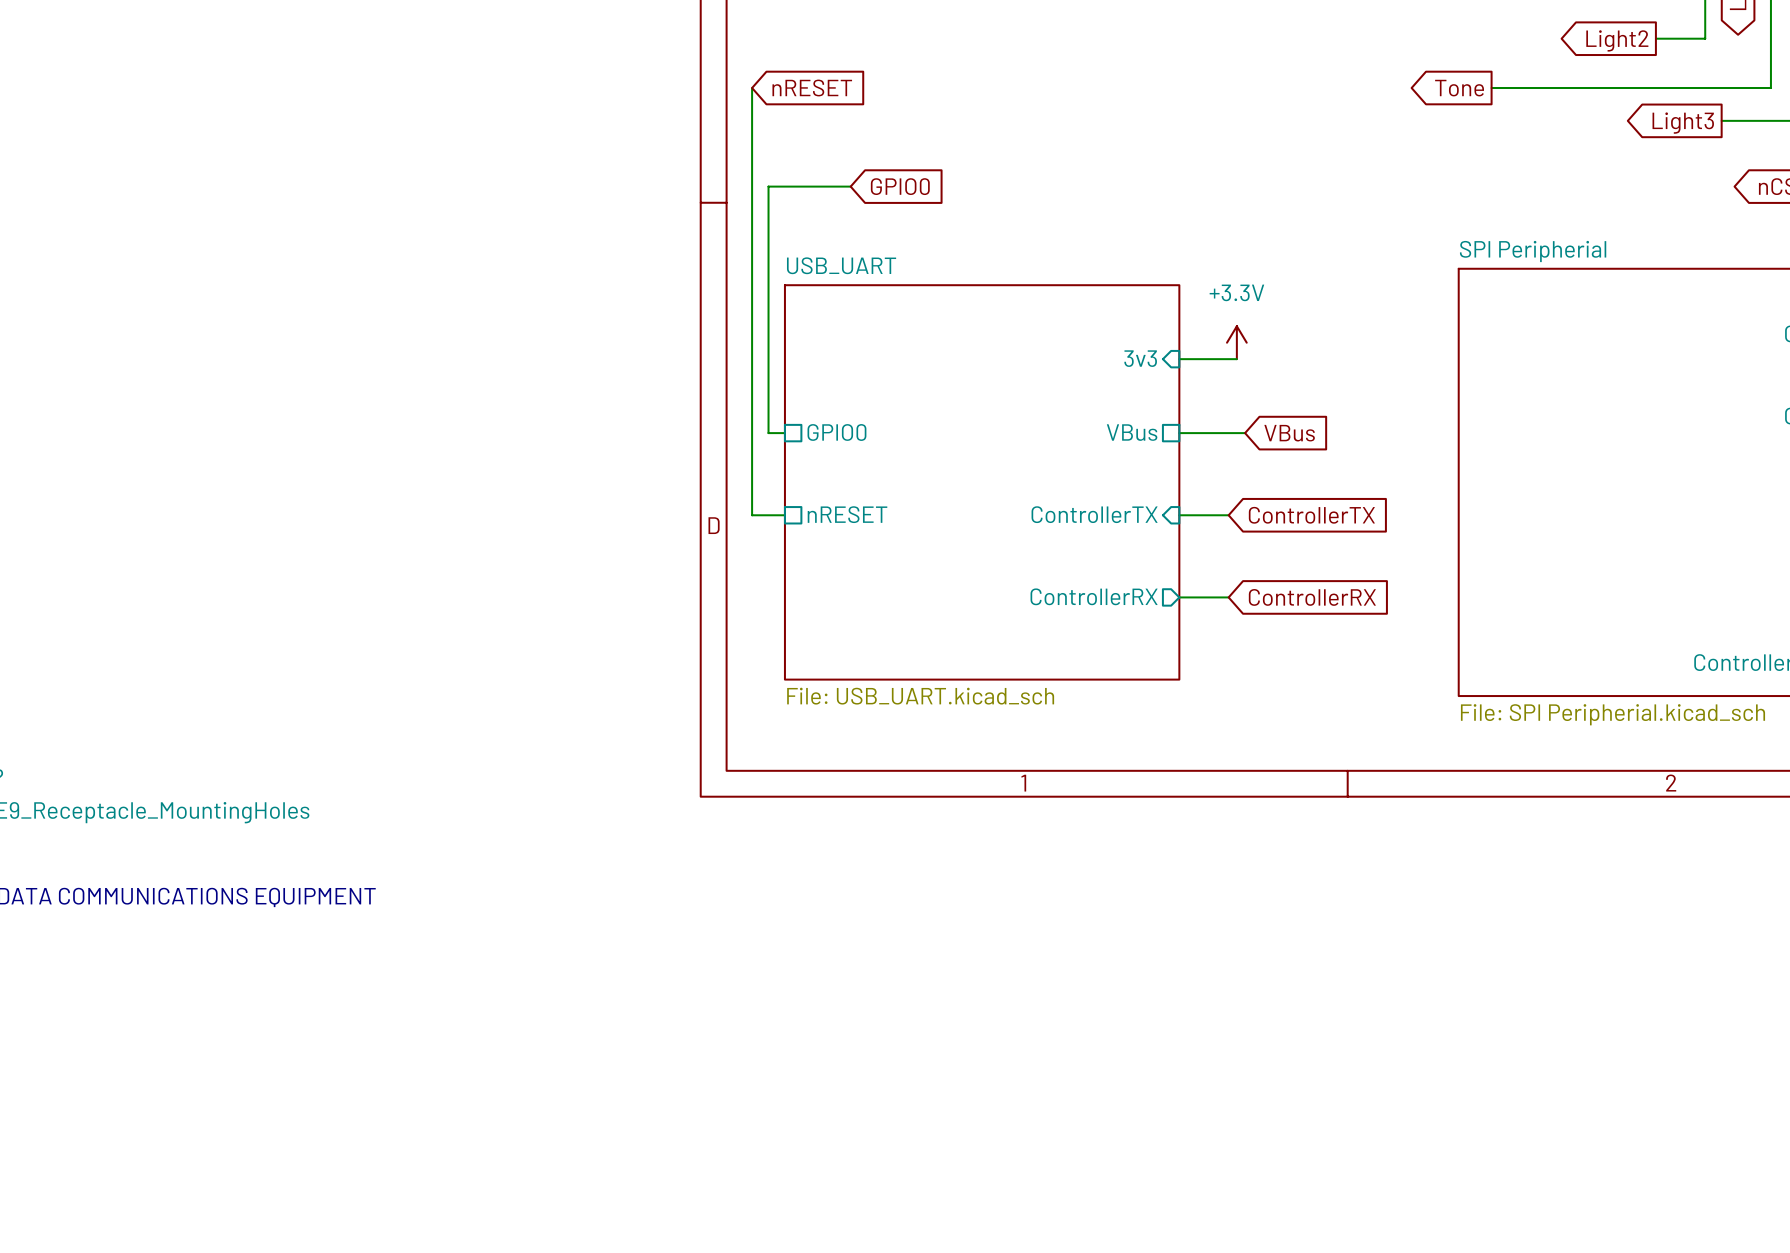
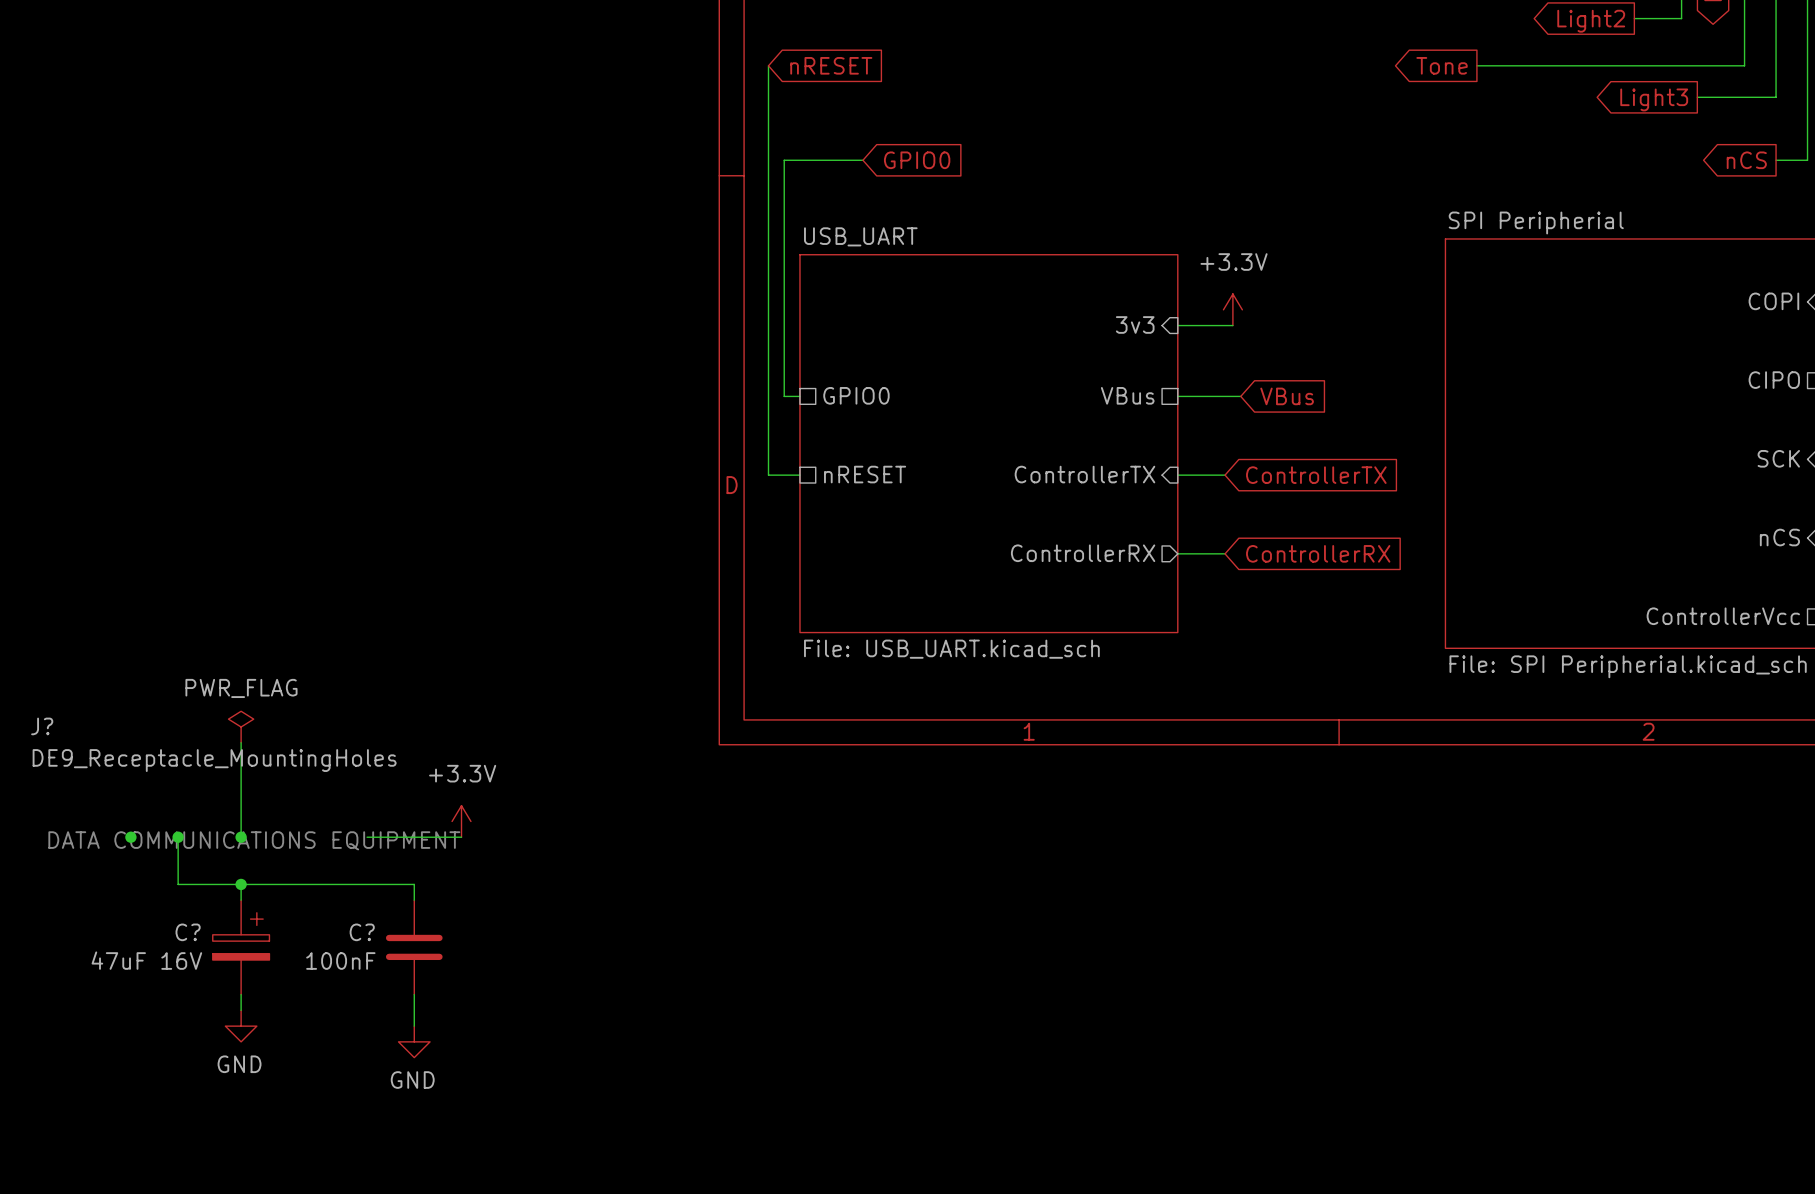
power symbol: none -> PWR_FLAG (241, 727)
wire: none -> (241, 742) (241, 837)
power symbol: none -> +3.3V (461, 821)
junction: none -> (130, 837)
wire: none -> (178, 837) (178, 884) (414, 884) (414, 900)
junction: none -> (178, 837)
junction: none -> (241, 837)
wire: none -> (367, 837) (461, 837)
wire: none -> (241, 884) (241, 900)
junction: none -> (241, 884)
C?: none -> 47uF 16V (241, 947)
C?: none -> 100nF (414, 947)
wire: none -> (241, 994) (241, 1010)
wire: none -> (414, 994) (414, 1026)
power symbol: none -> GND (241, 1026)
power symbol: none -> GND (414, 1041)

